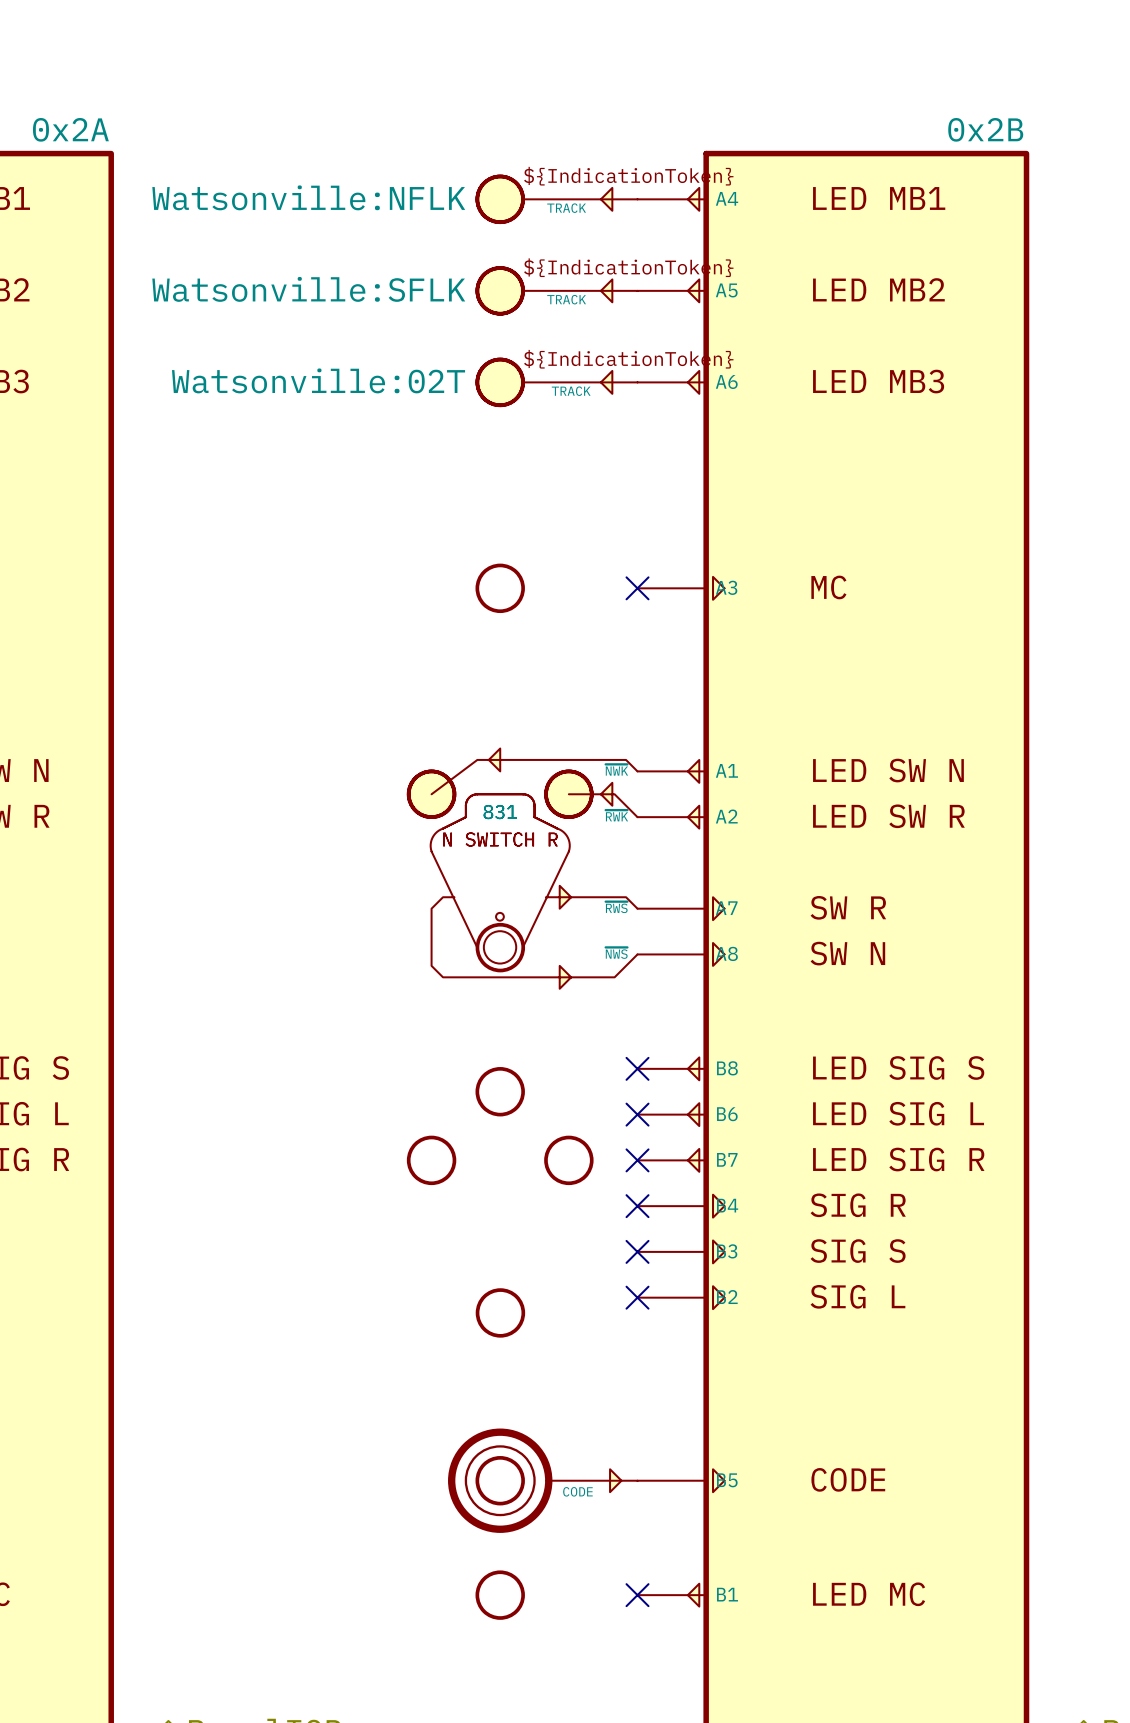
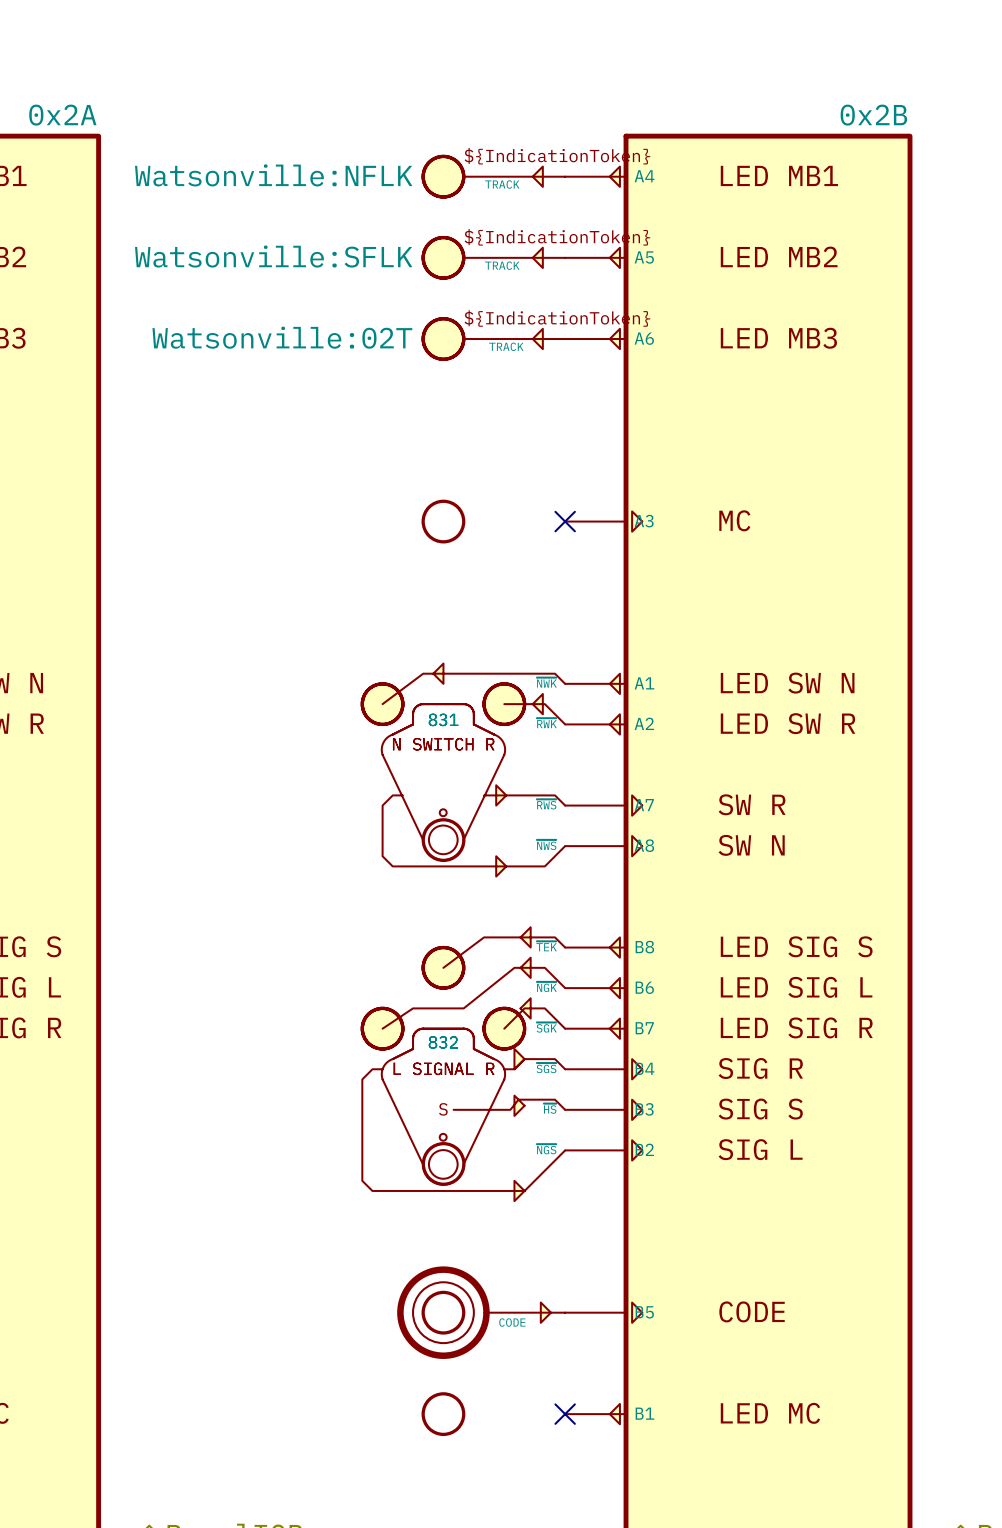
no-connect mark: (637, 1068) -> none
no-connect mark: (637, 1114) -> none
part: none -> 832 (462, 993)
no-connect mark: (637, 1160) -> none
no-connect mark: (637, 1206) -> none
no-connect mark: (637, 1251) -> none
part: none -> 832 (463, 1114)
no-connect mark: (637, 1297) -> none

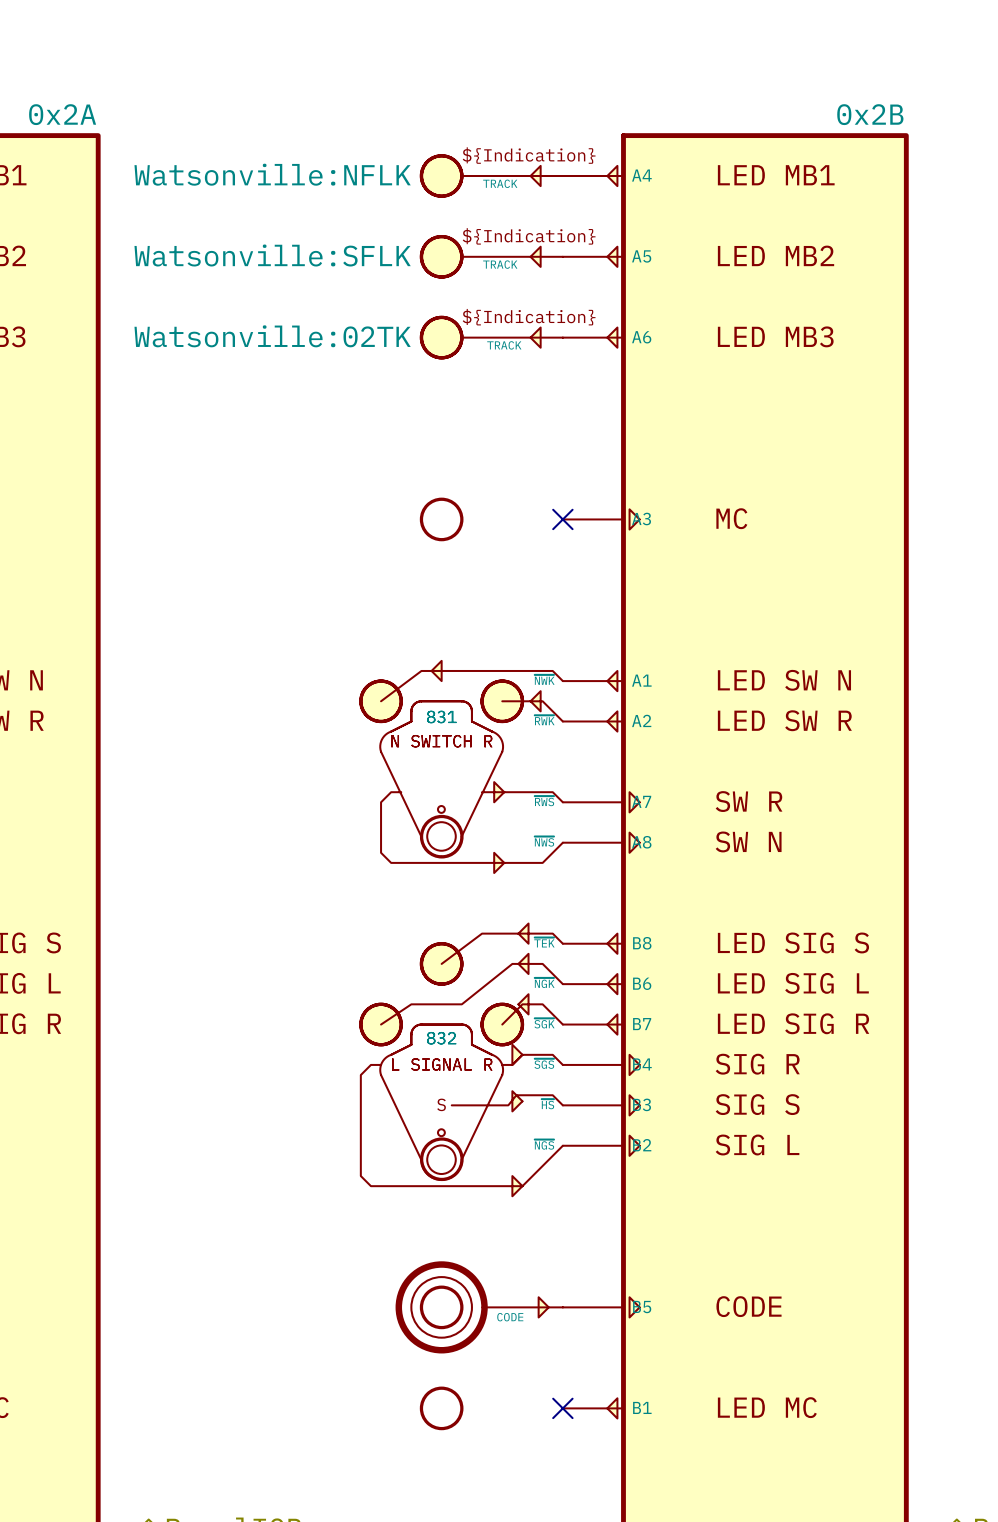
part text: ${IndicationToken} (557, 156) -> ${Indication} (529, 155)
part text: ${IndicationToken} (557, 237) -> ${Indication} (529, 236)
part text: ${IndicationToken} (557, 318) -> ${Indication} (529, 317)
part text: none -> Watsonville:02TK (272, 336)
part text: Watsonville:02T (282, 337) -> none

